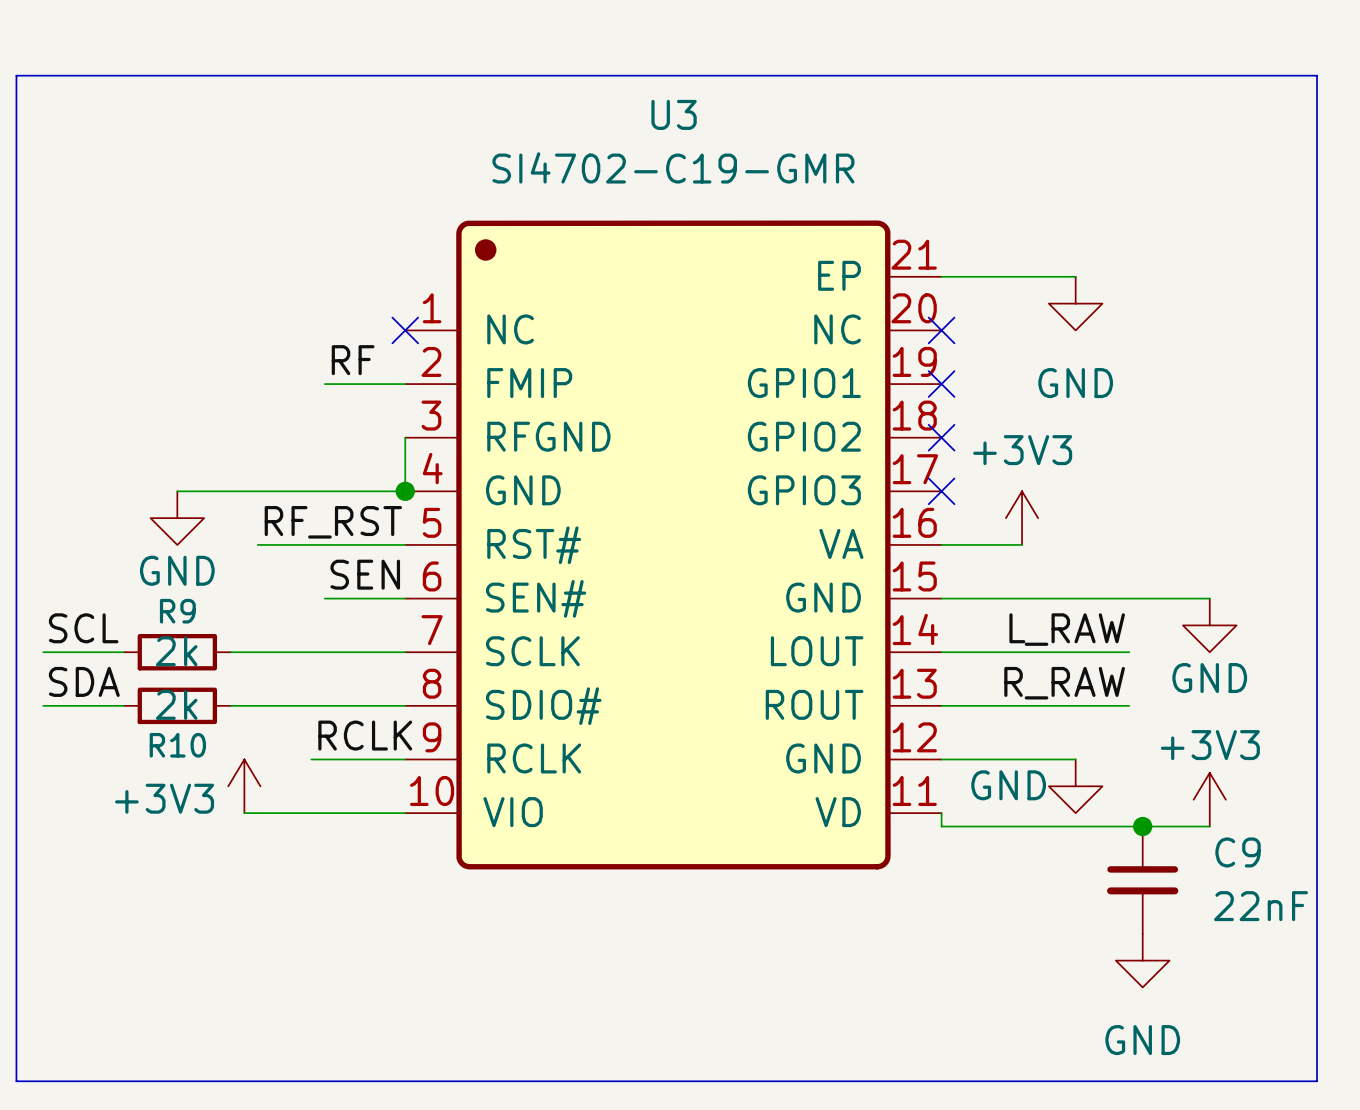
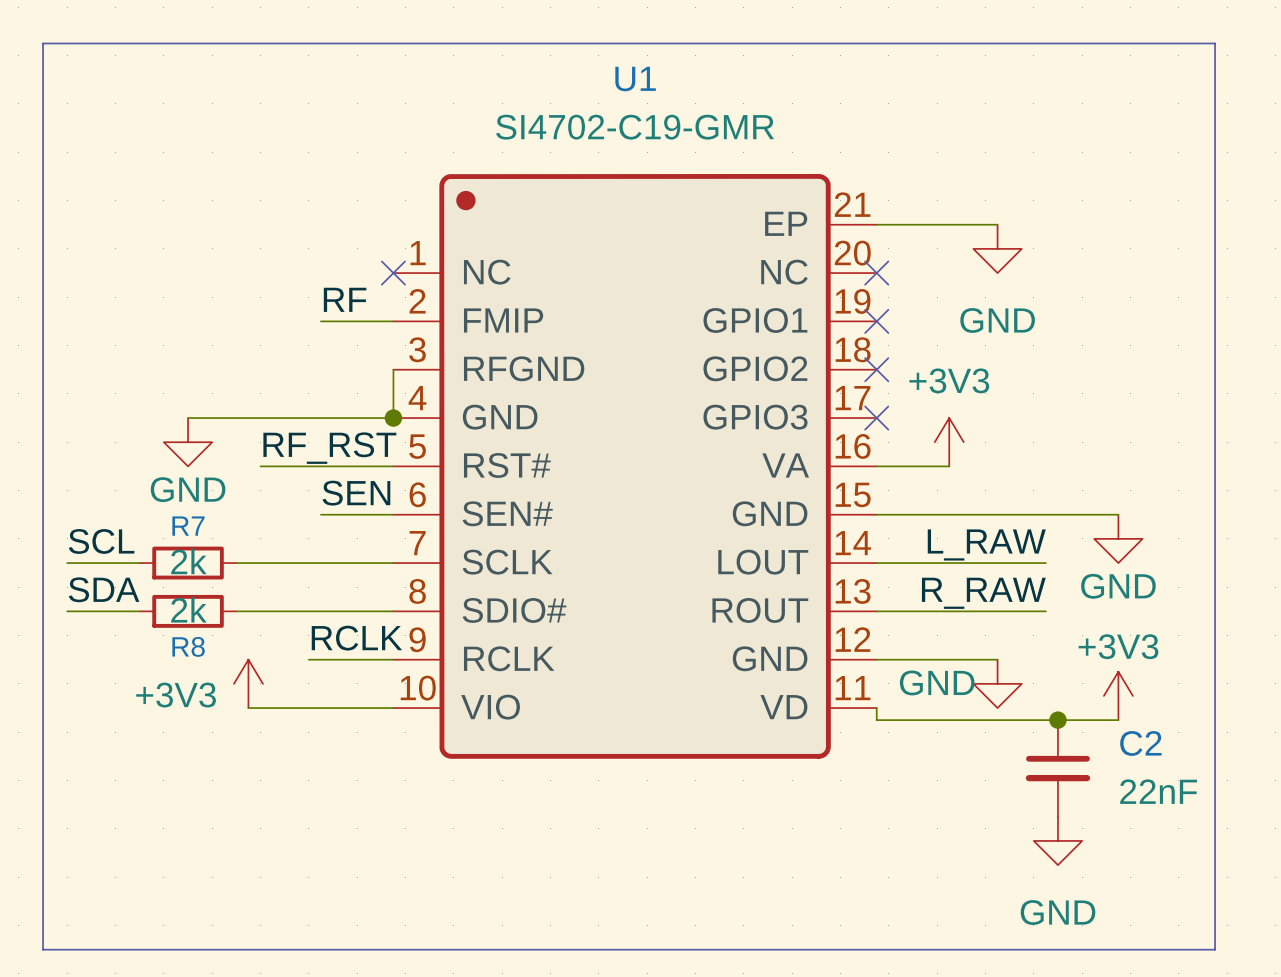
U3 name: U3 (674, 114) -> U1 (635, 79)
R9 name: R9 (177, 611) -> R7 (188, 526)
R10 name: R10 (177, 745) -> R8 (188, 646)
C9 name: C9 (1238, 852) -> C2 (1140, 743)

